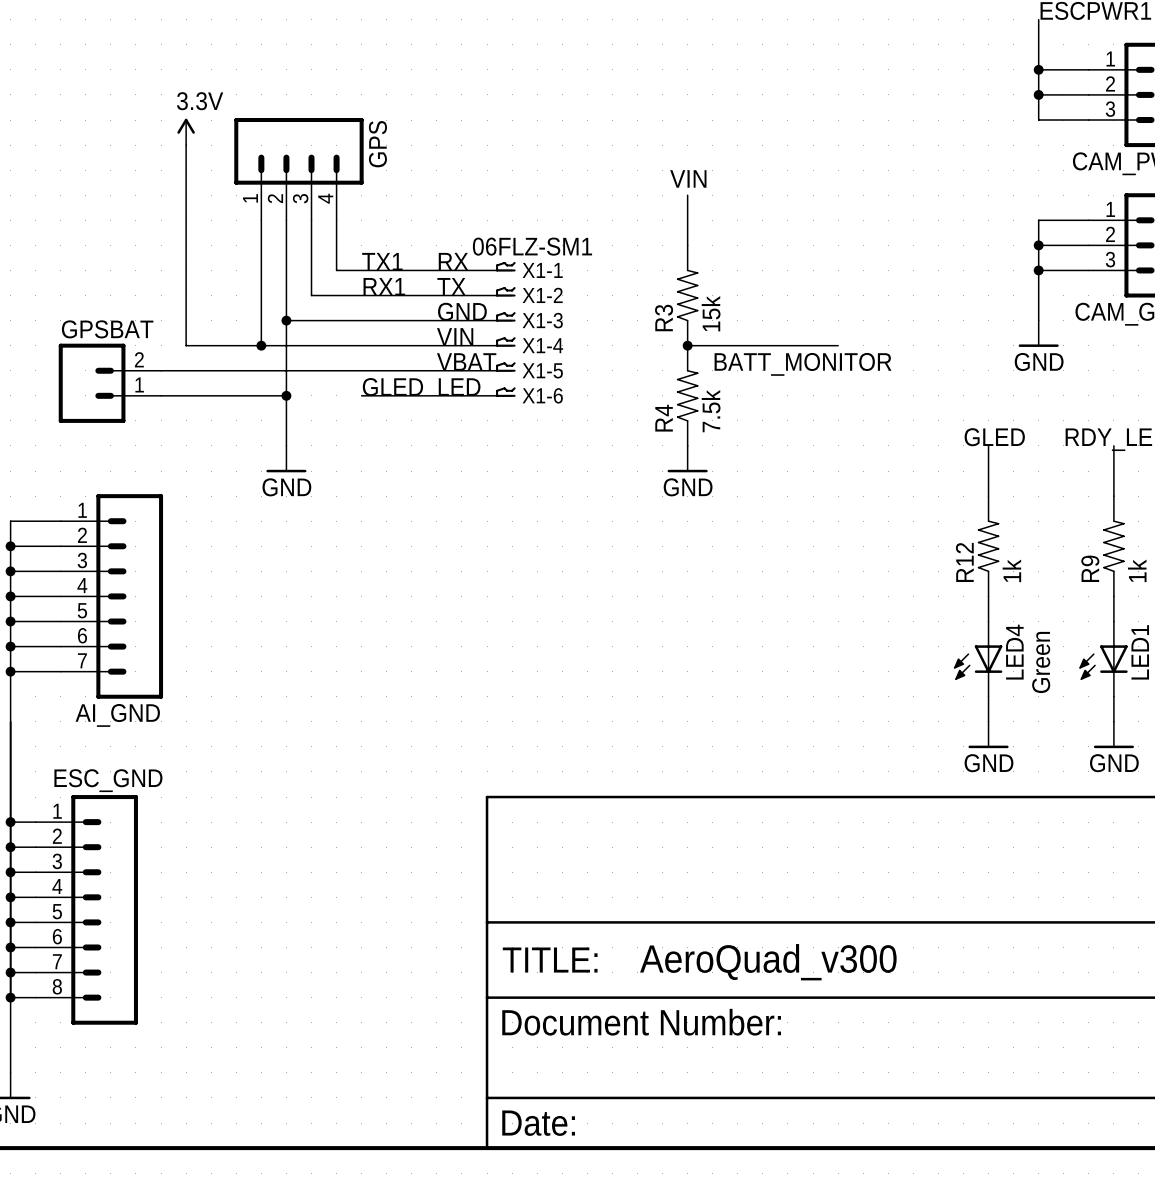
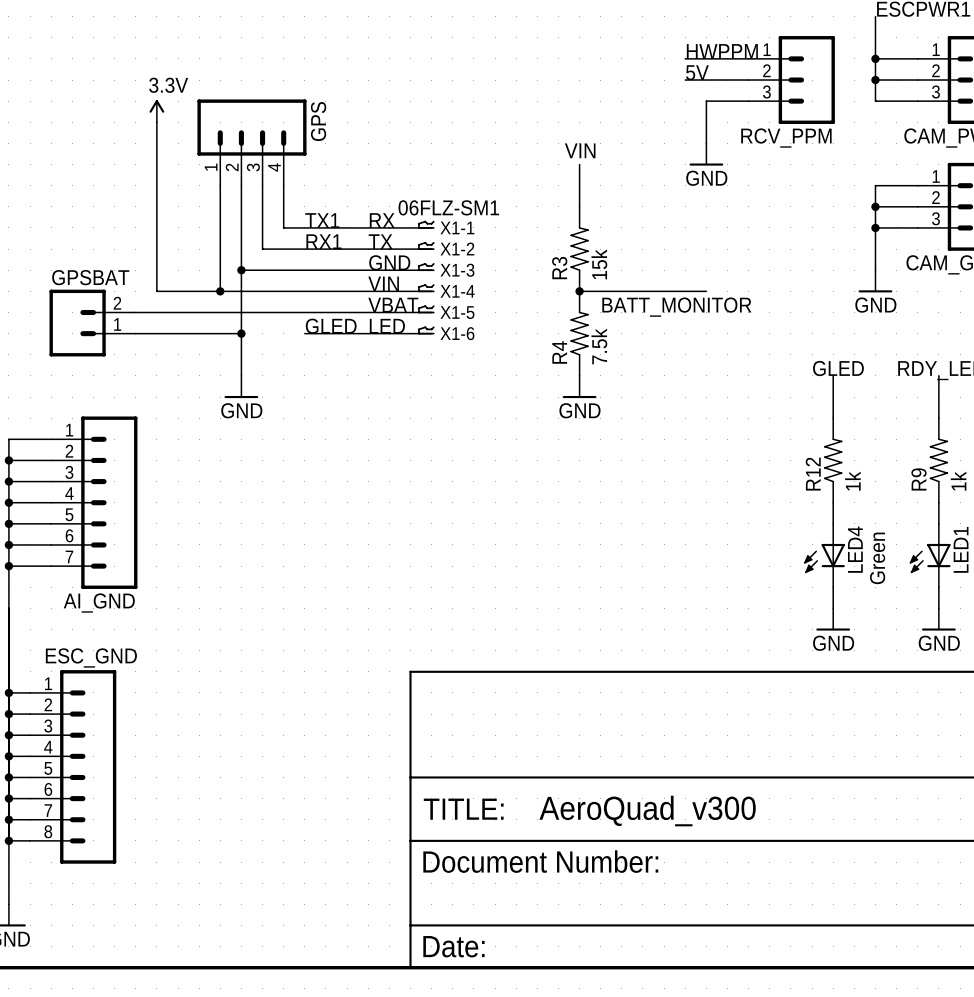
label: none -> HWPPM (722, 51)
wire: none -> (685, 58) (748, 58)
label: none -> 5V (697, 72)
wire: none -> (685, 80) (748, 80)
RCV_PPM: none -> (791, 80)
wire: none -> (748, 101) (706, 101) (706, 143)
power symbol: none -> GND (706, 154)

